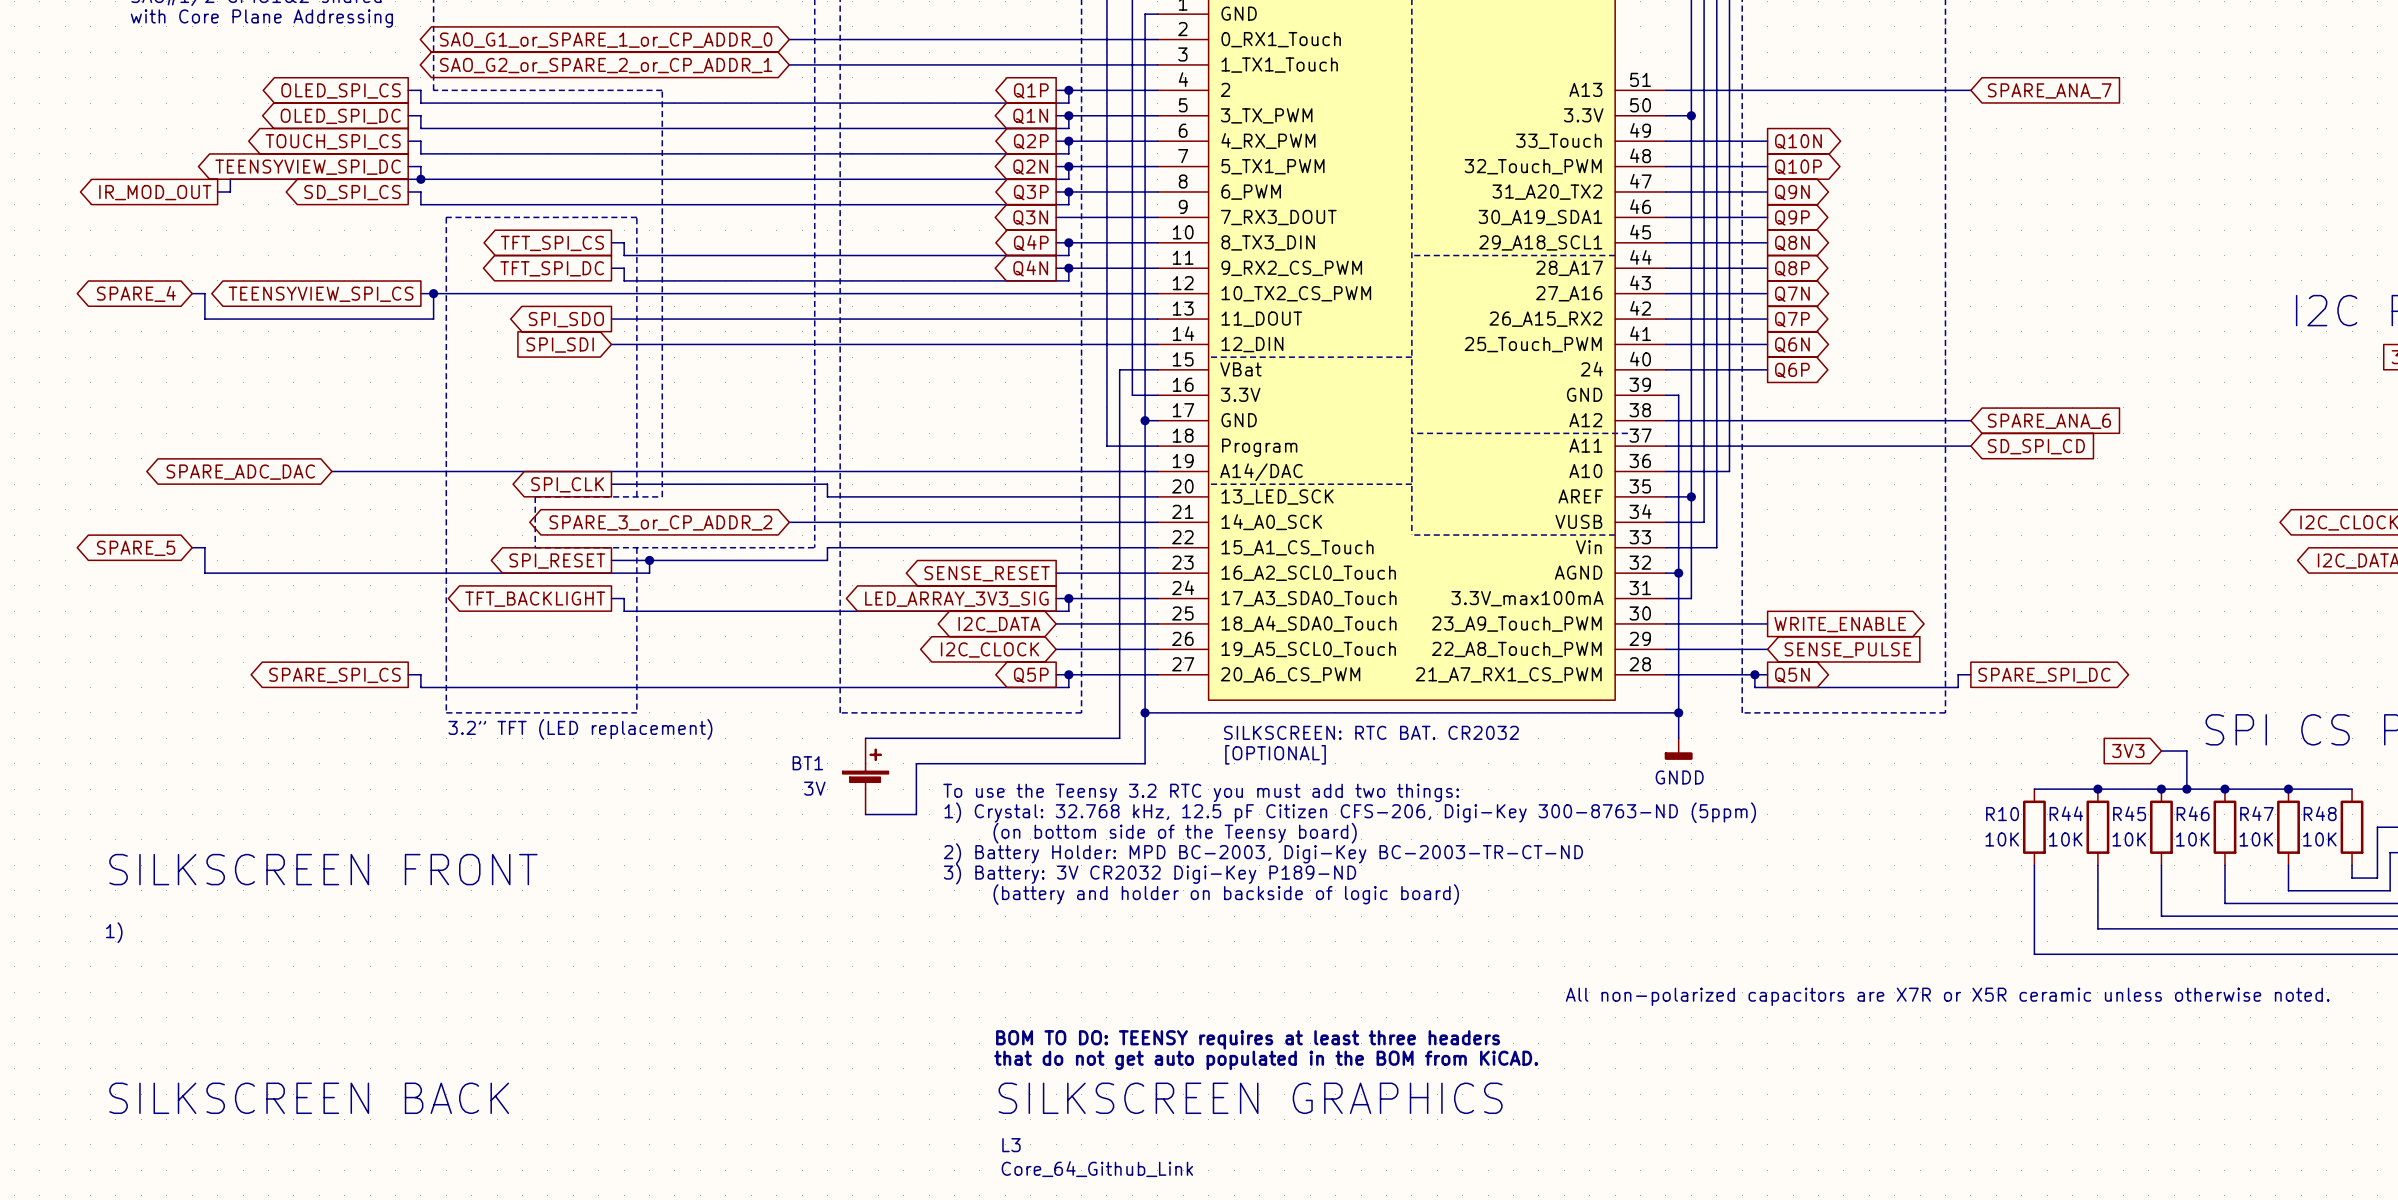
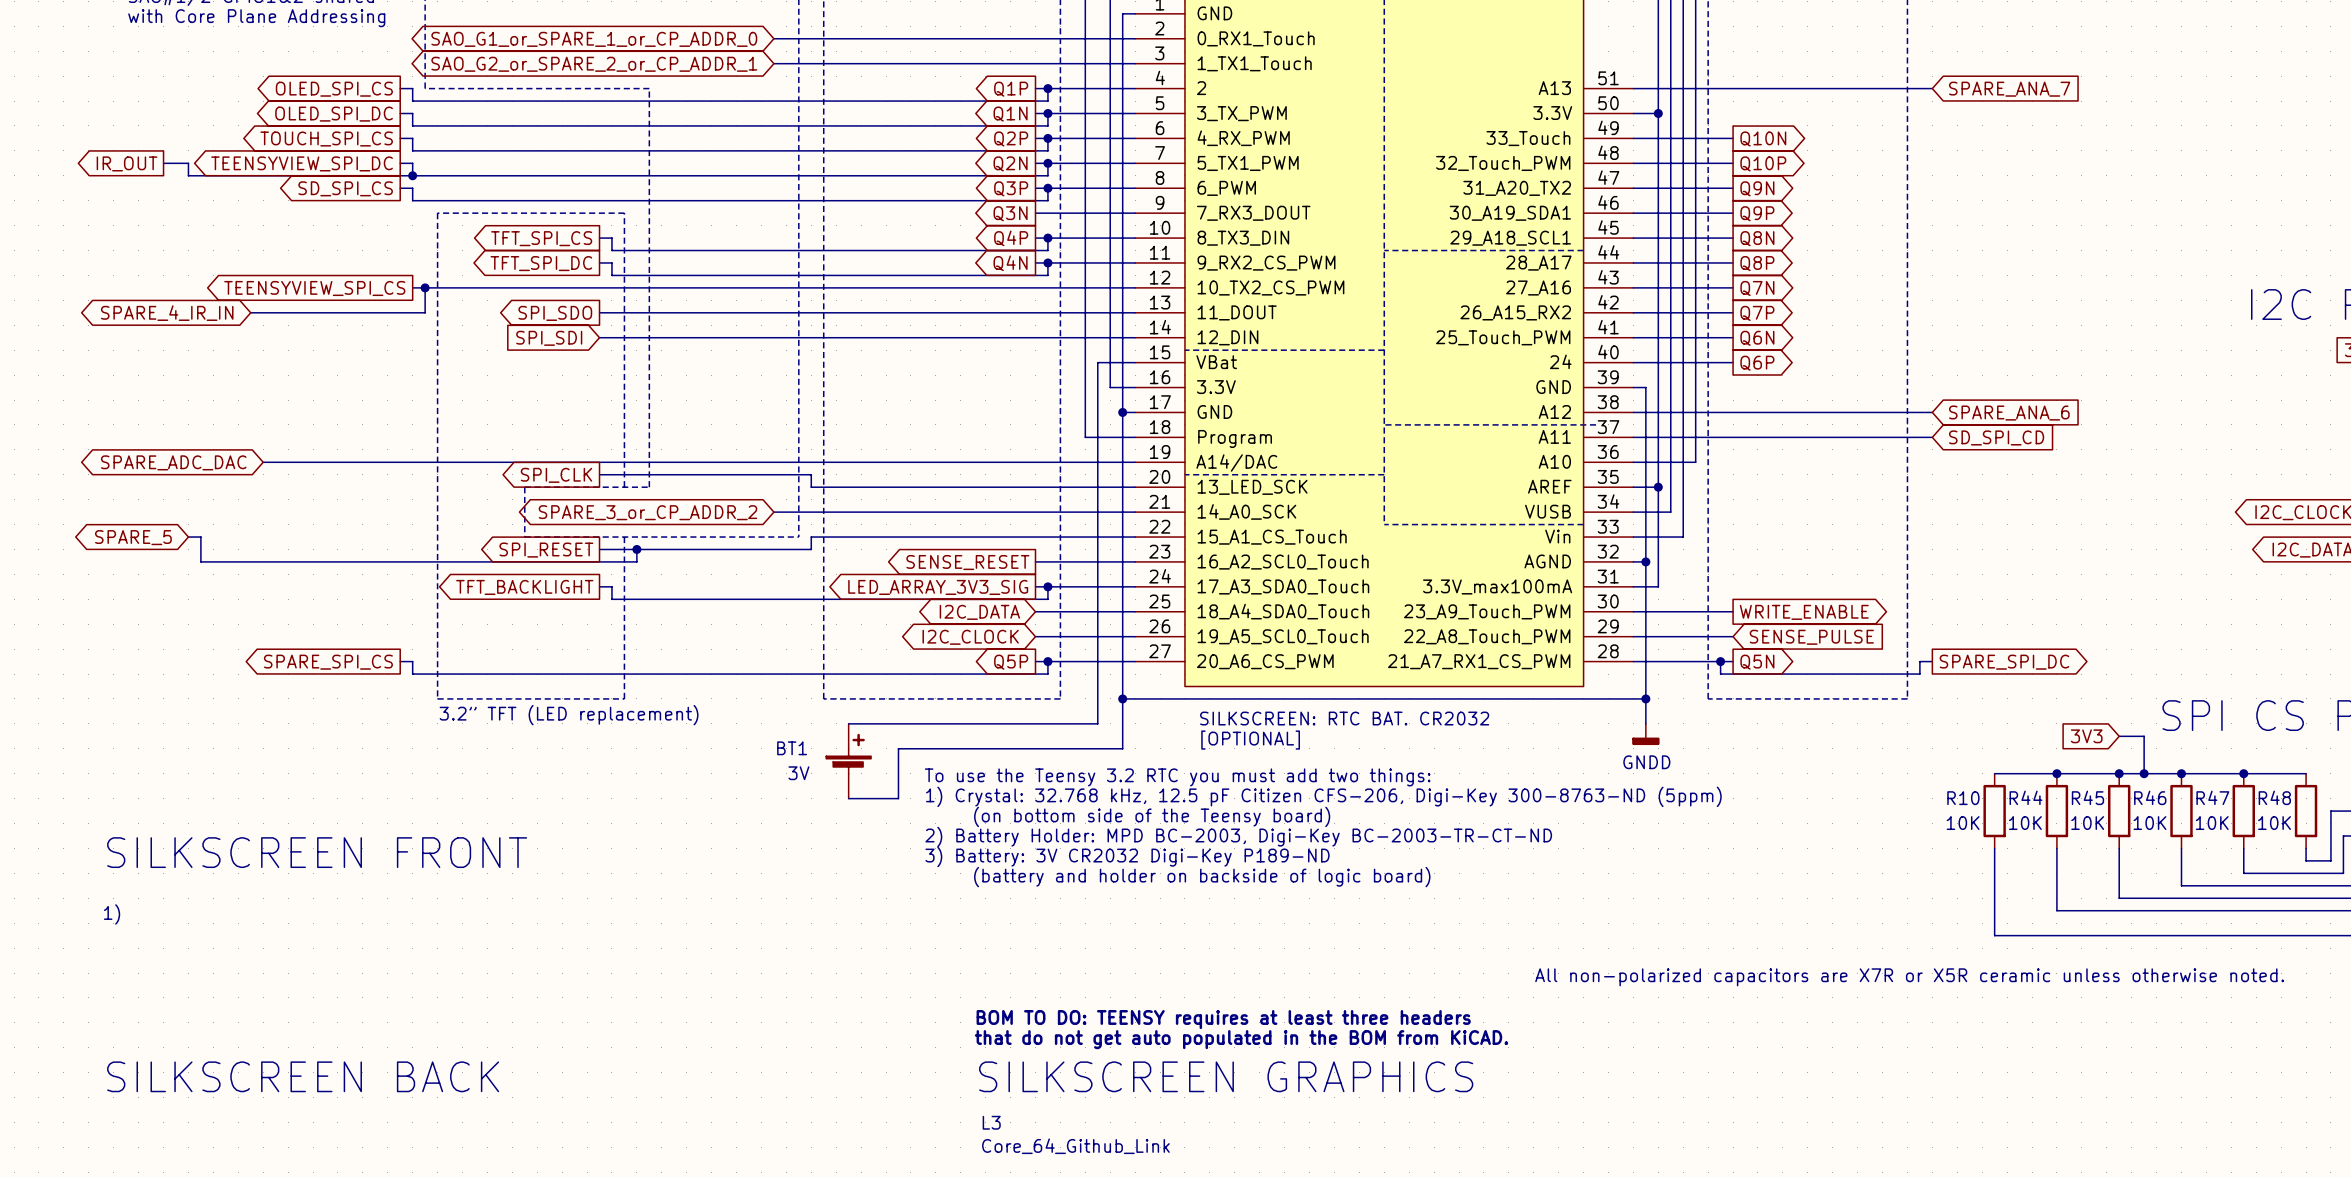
wire: (230, 179) (230, 191) (217, 191) -> (225, 175) (188, 175) (188, 163) (163, 163)
global label: IR_MOD_OUT (155, 192) -> IR_OUT (127, 163)
global label: SPARE_4 (136, 293) -> SPARE_4_IR_IN (167, 313)
wire: (192, 293) (204, 293) (204, 319) (255, 319) -> none
wire: none -> (263, 462) (325, 462)
global label position: SPARE_ADC_DAC (240, 472) -> SPARE_ADC_DAC (173, 462)

